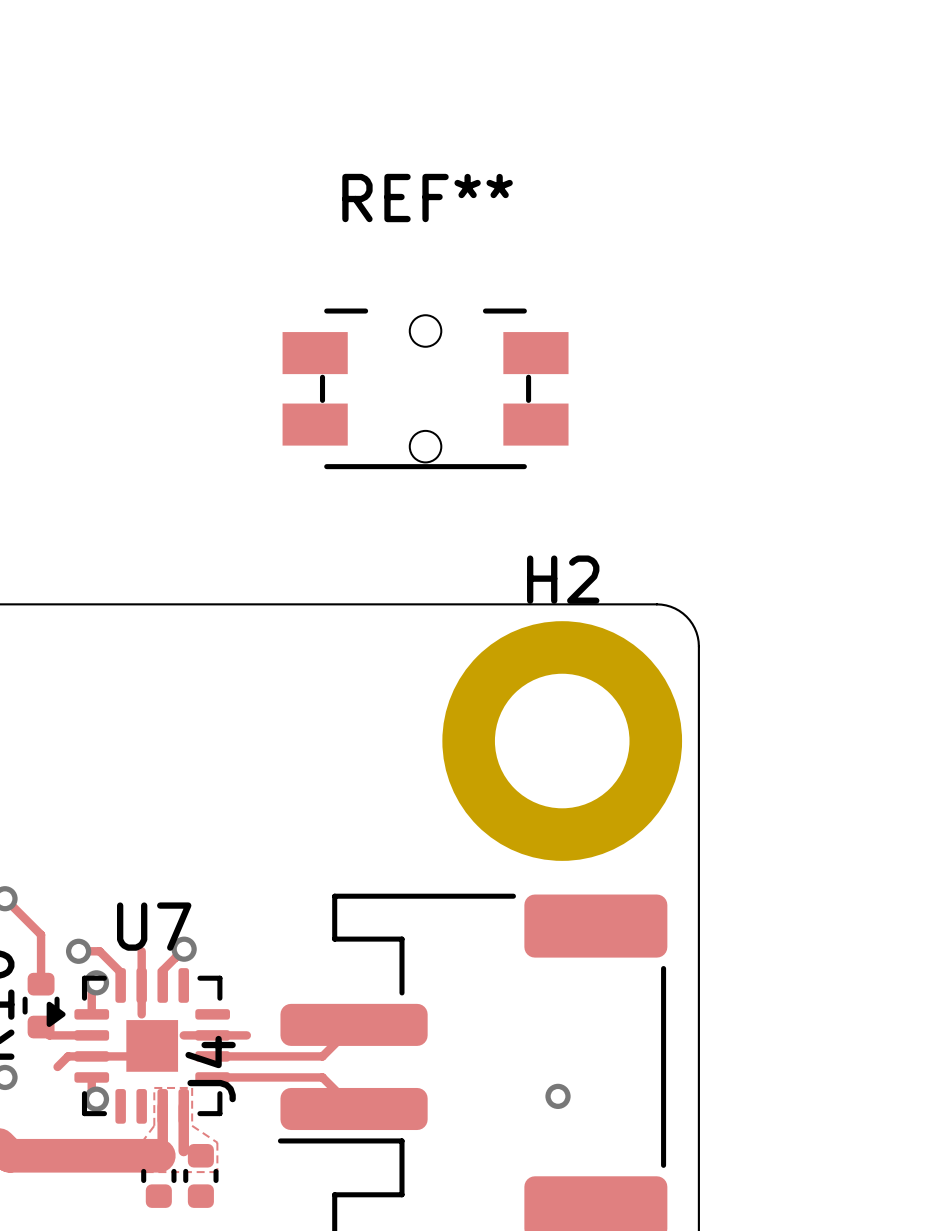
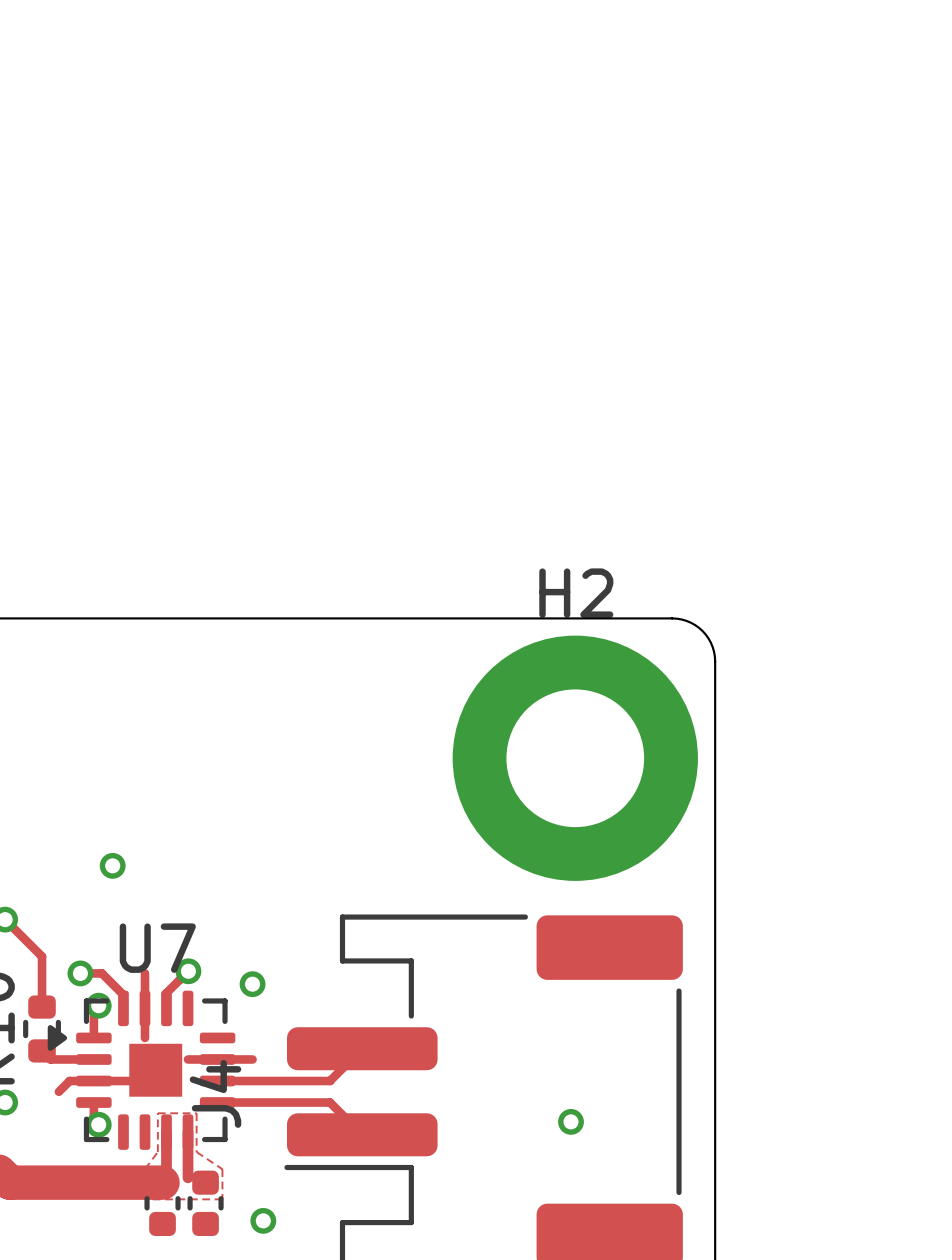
REF**: (425, 388) -> none
via: none -> (112, 865)
via: none -> (252, 984)
via: none -> (263, 1220)

